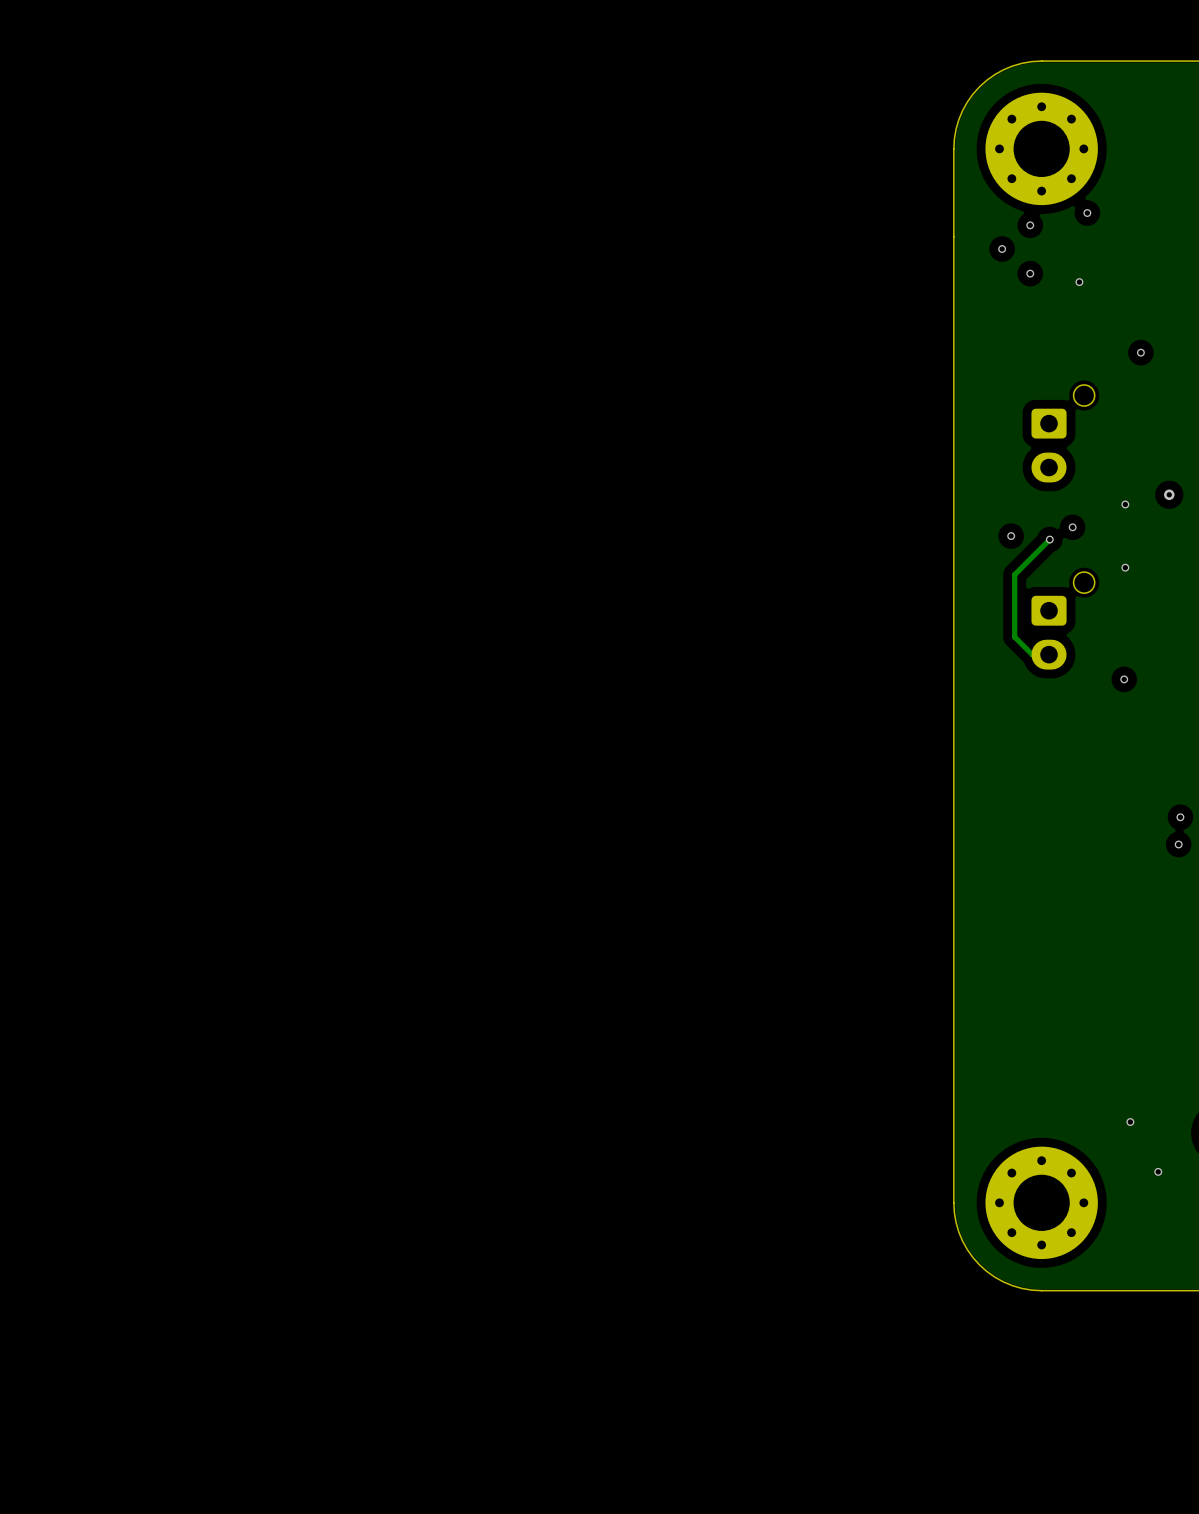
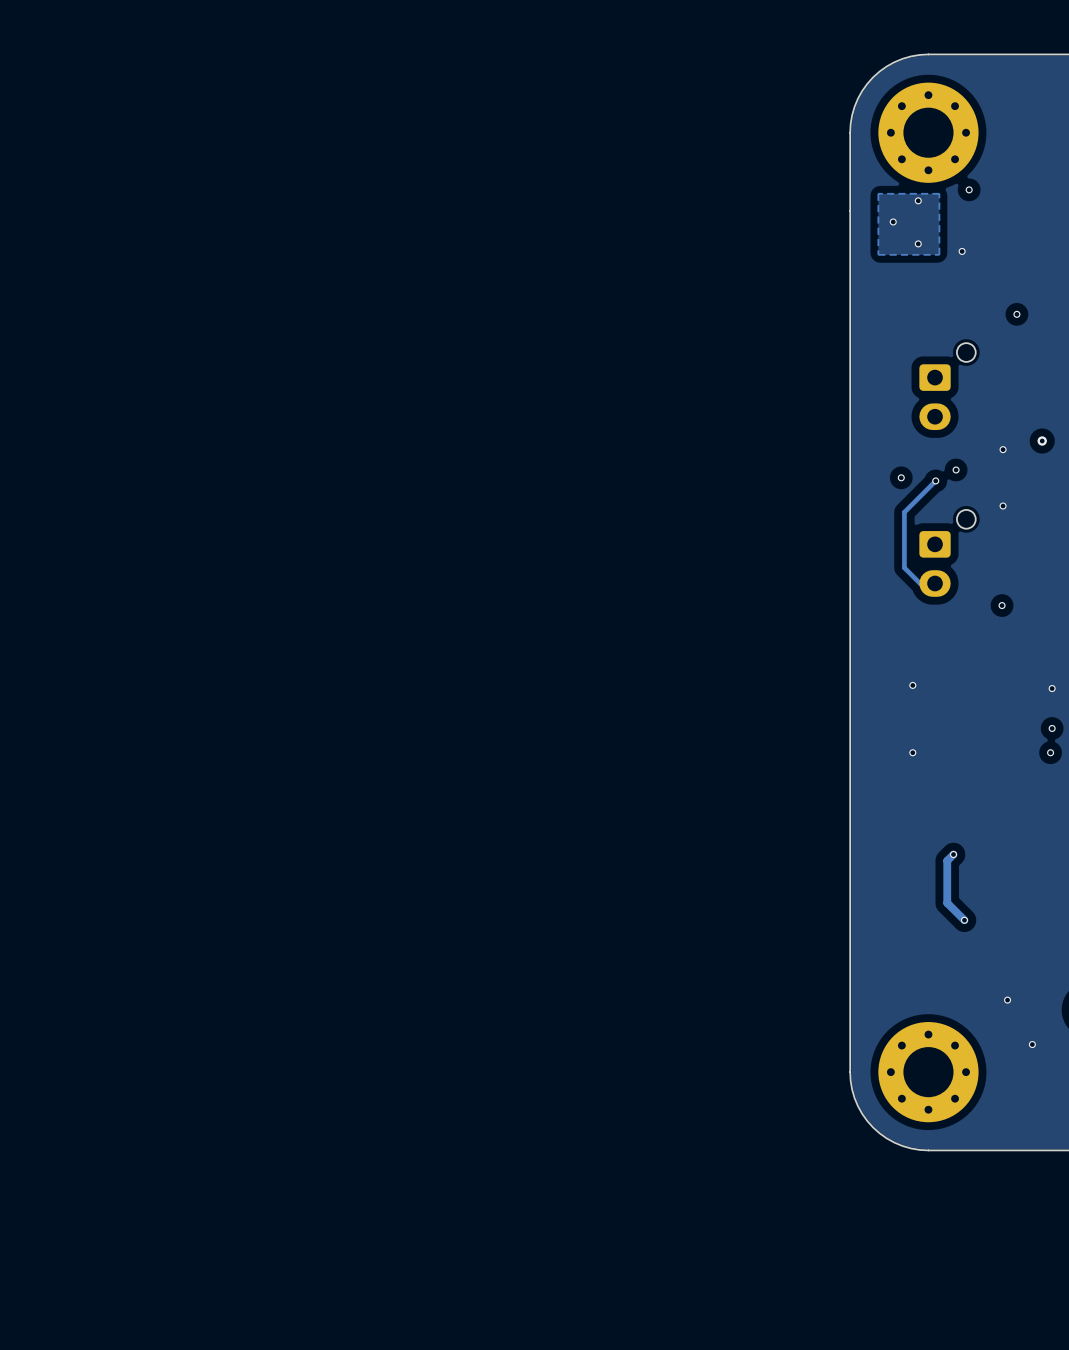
zone outline: none -> (939, 193) (939, 254) (878, 254) (878, 193) (939, 193)
via: none -> (912, 685)
via: none -> (1052, 688)
via: none -> (912, 752)
track: none -> (953, 854) (947, 860) (947, 903) (964, 920)
via: none -> (953, 854)
via: none -> (964, 920)

